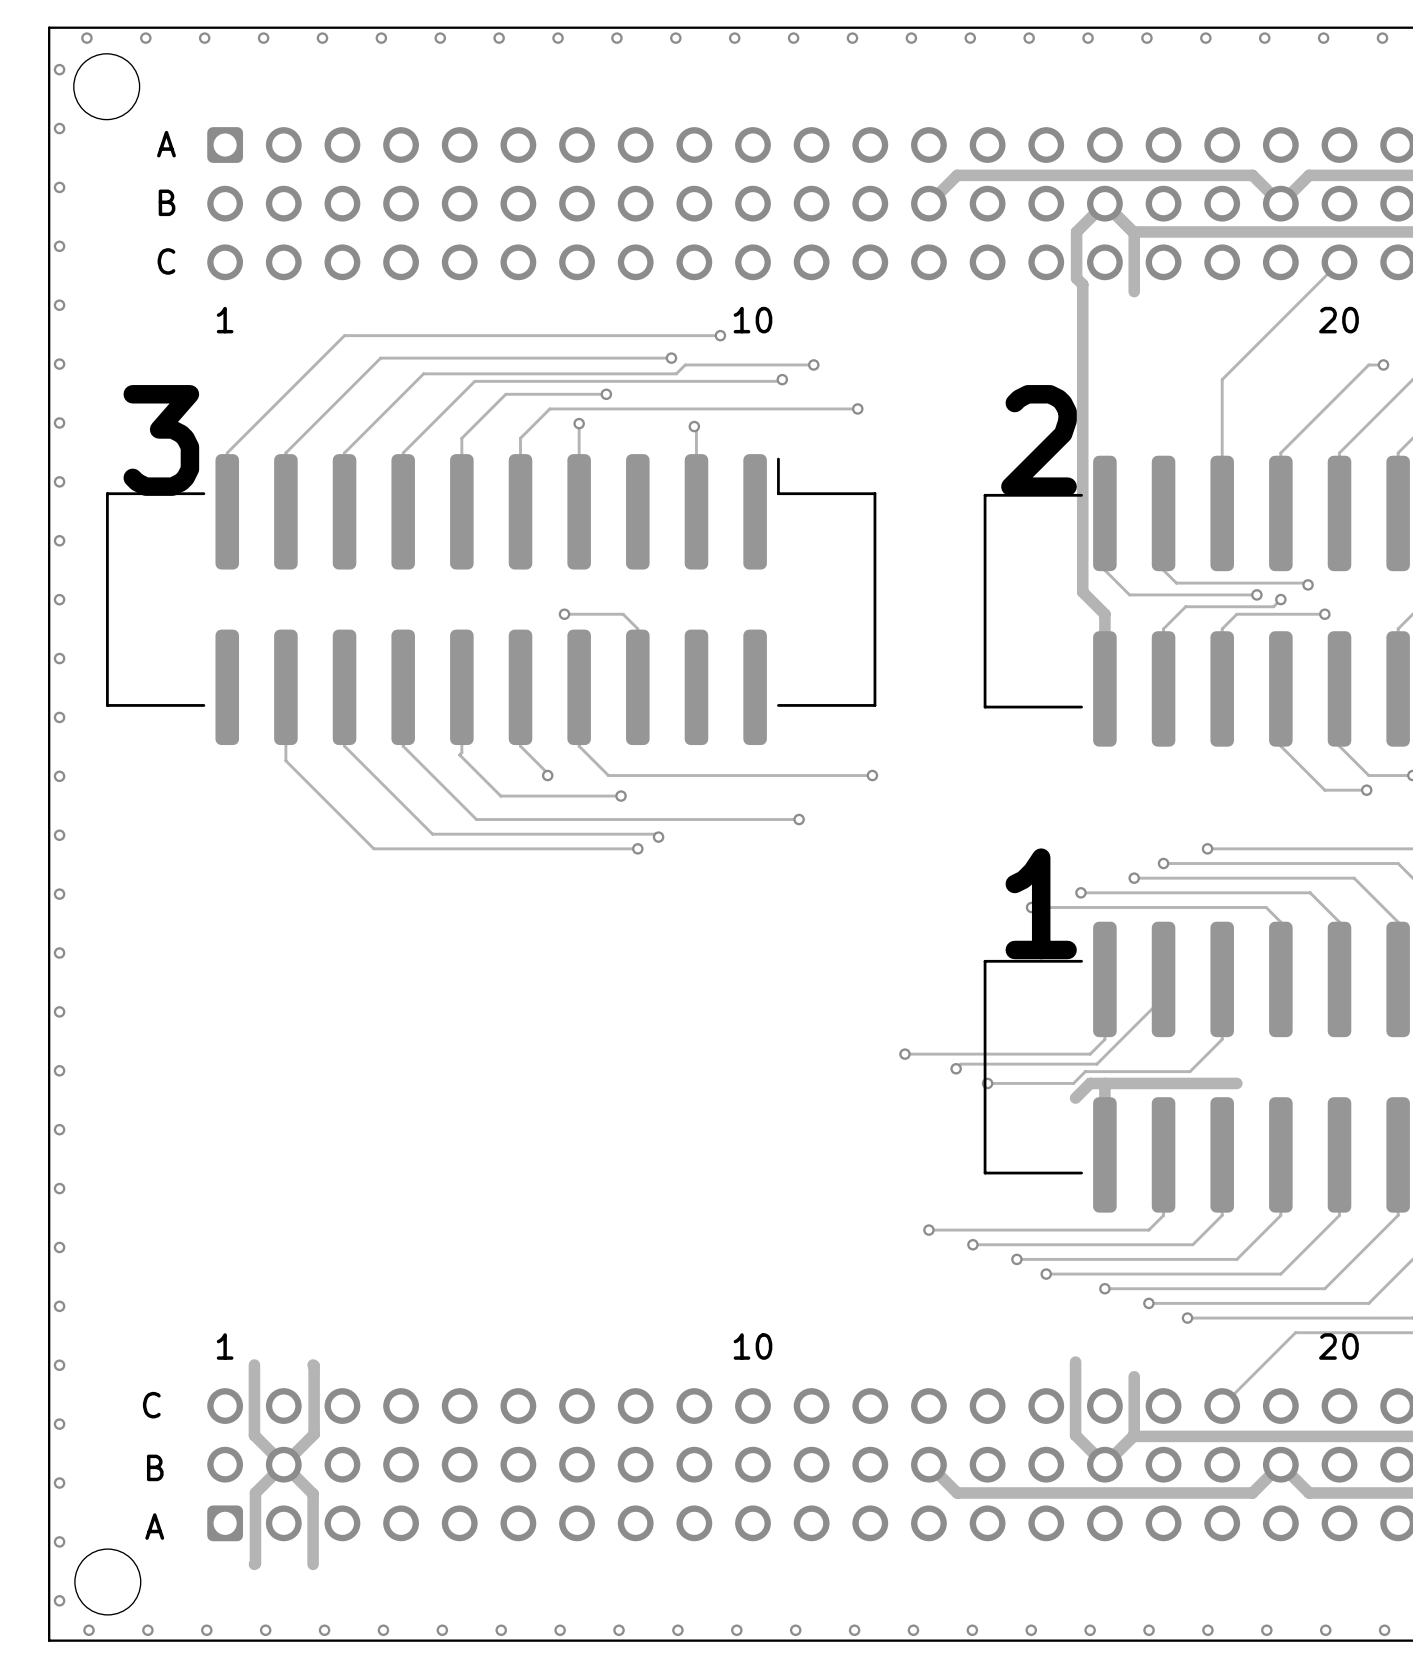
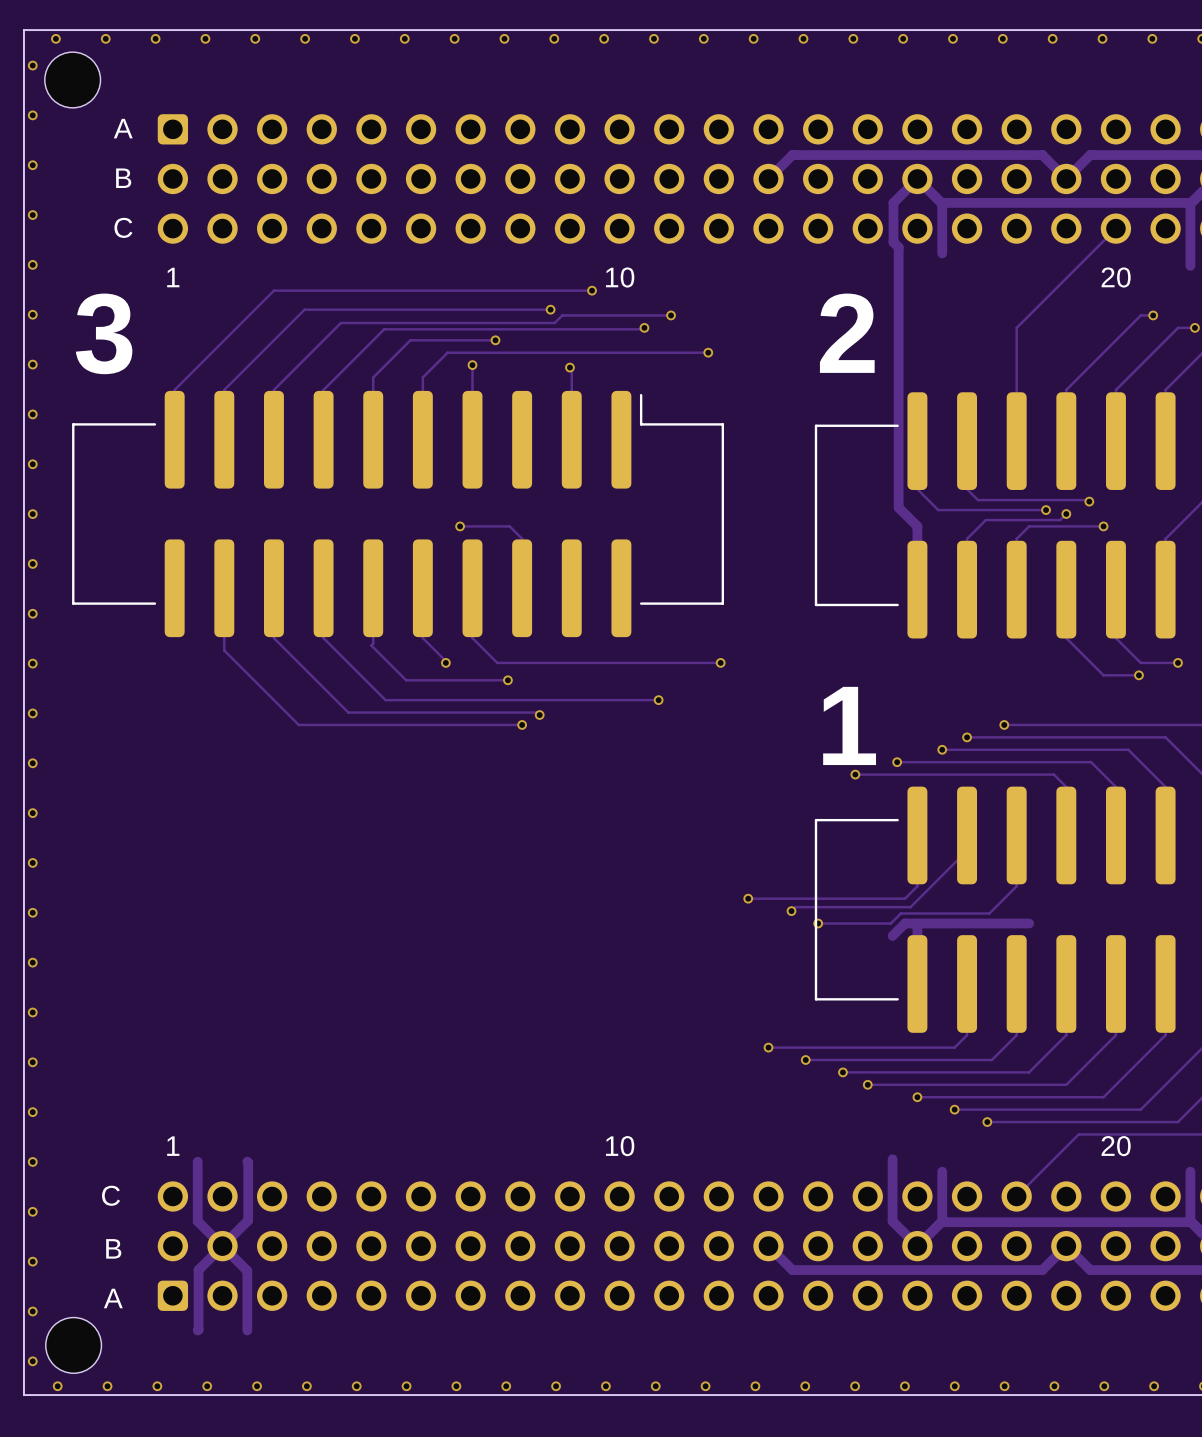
text position: 3 (161, 440) -> 3 (104, 333)
text position: 2 (1038, 440) -> 2 (847, 333)
text position: 1 (1041, 903) -> 1 (849, 725)

